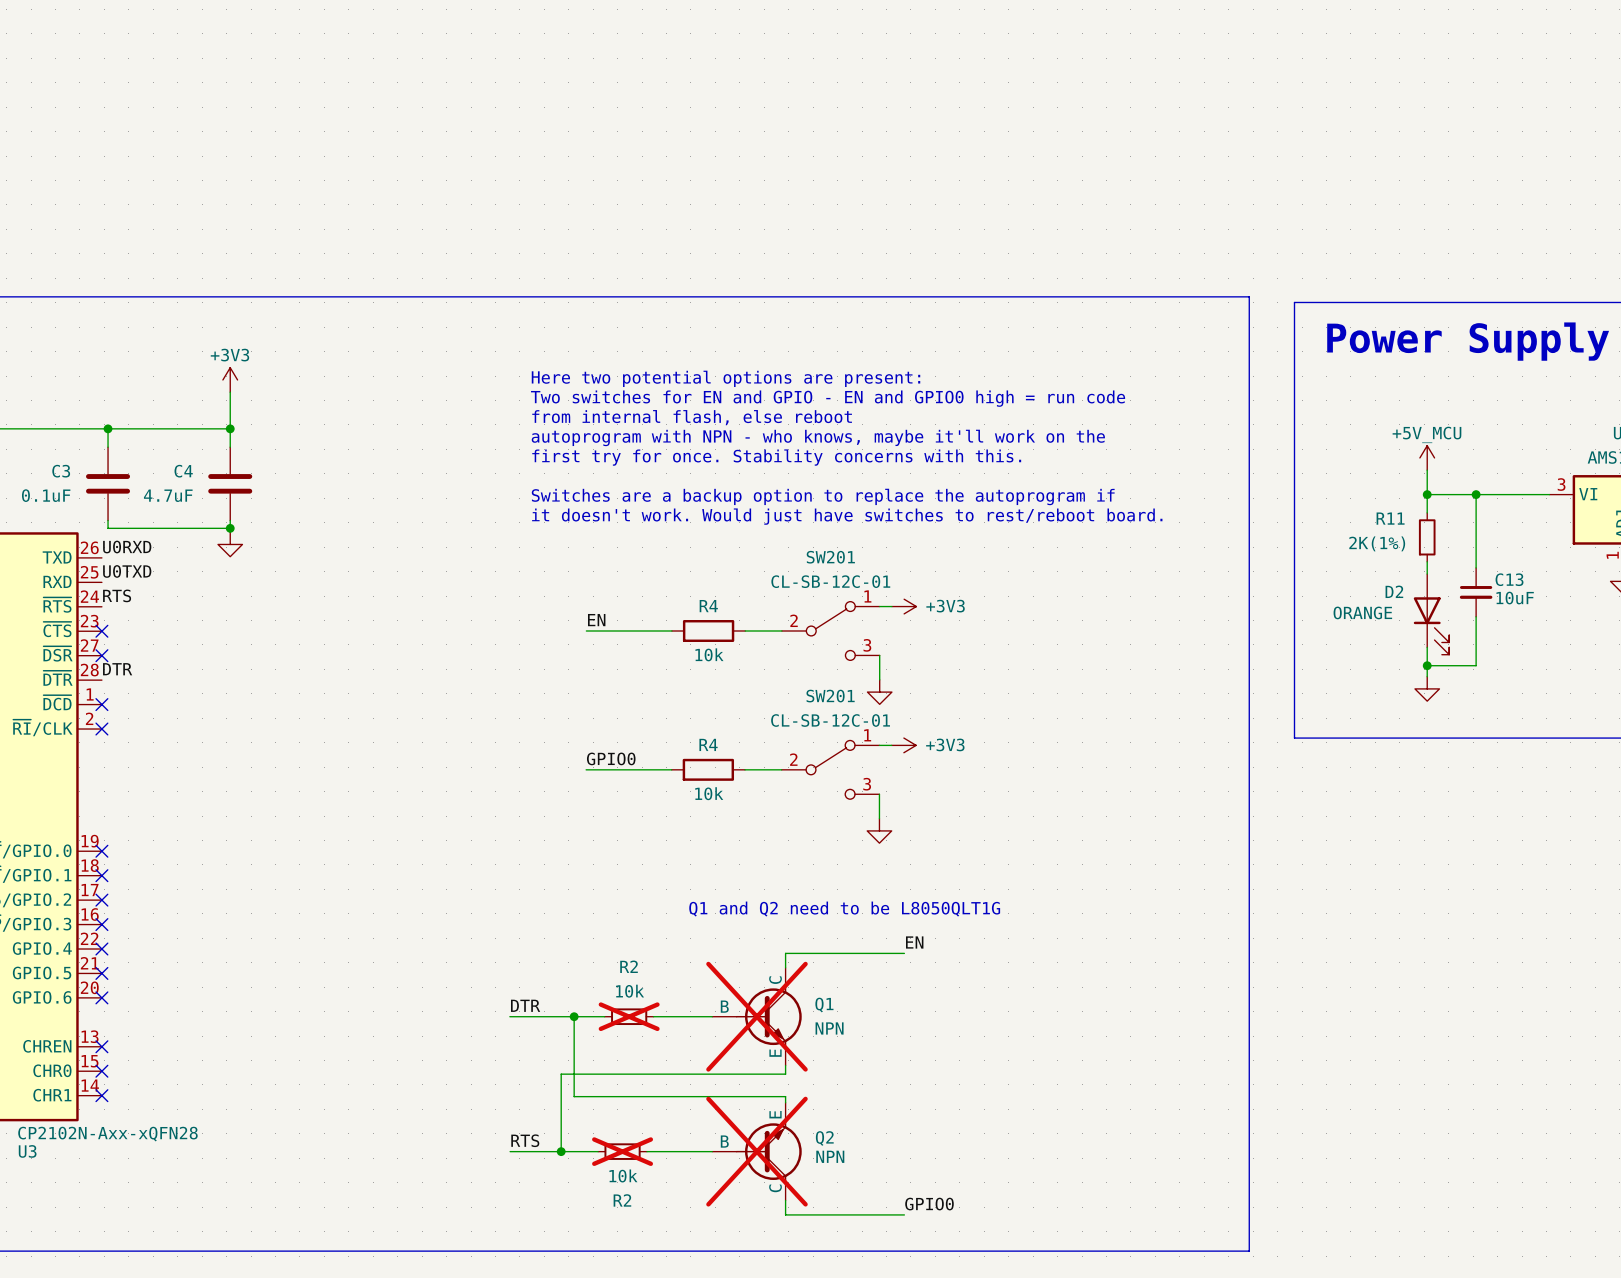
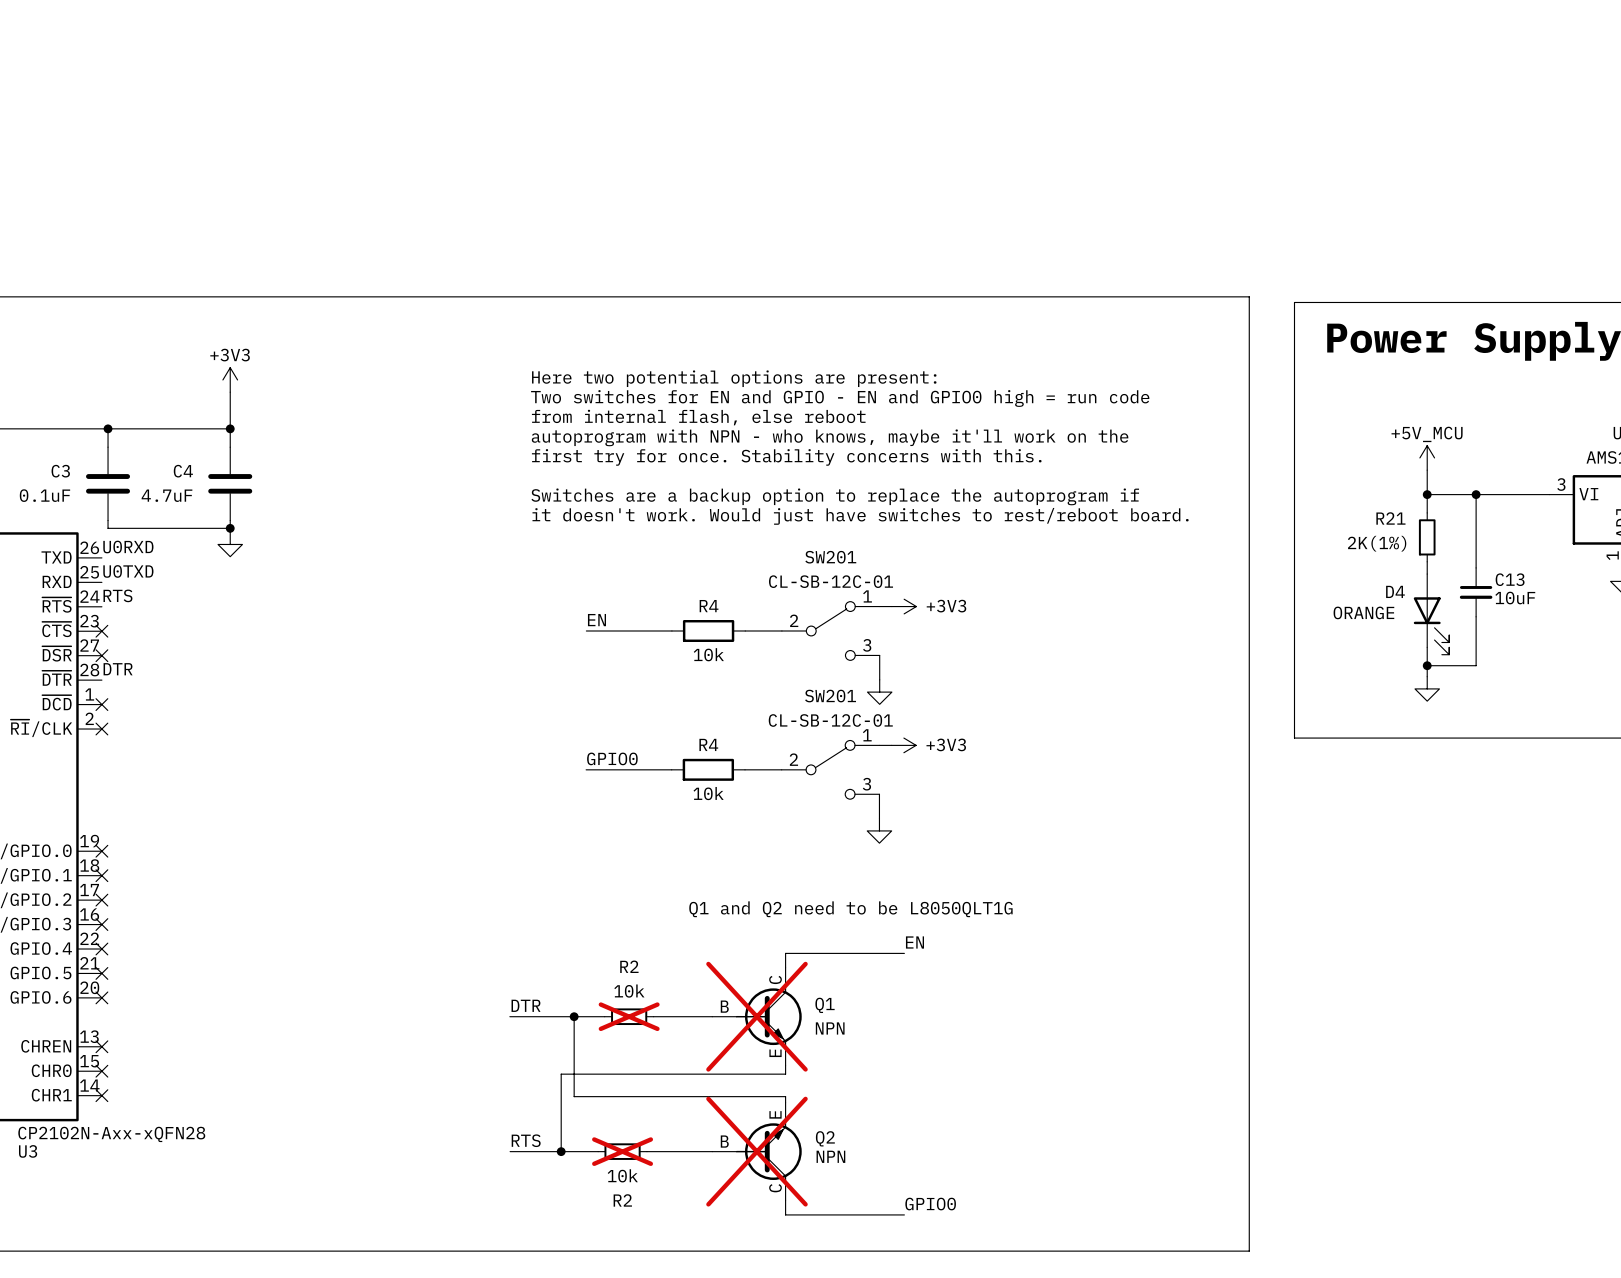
R11 name: R11 (1390, 518) -> R21 (1390, 518)
D2 name: D2 (1394, 591) -> D4 (1395, 591)

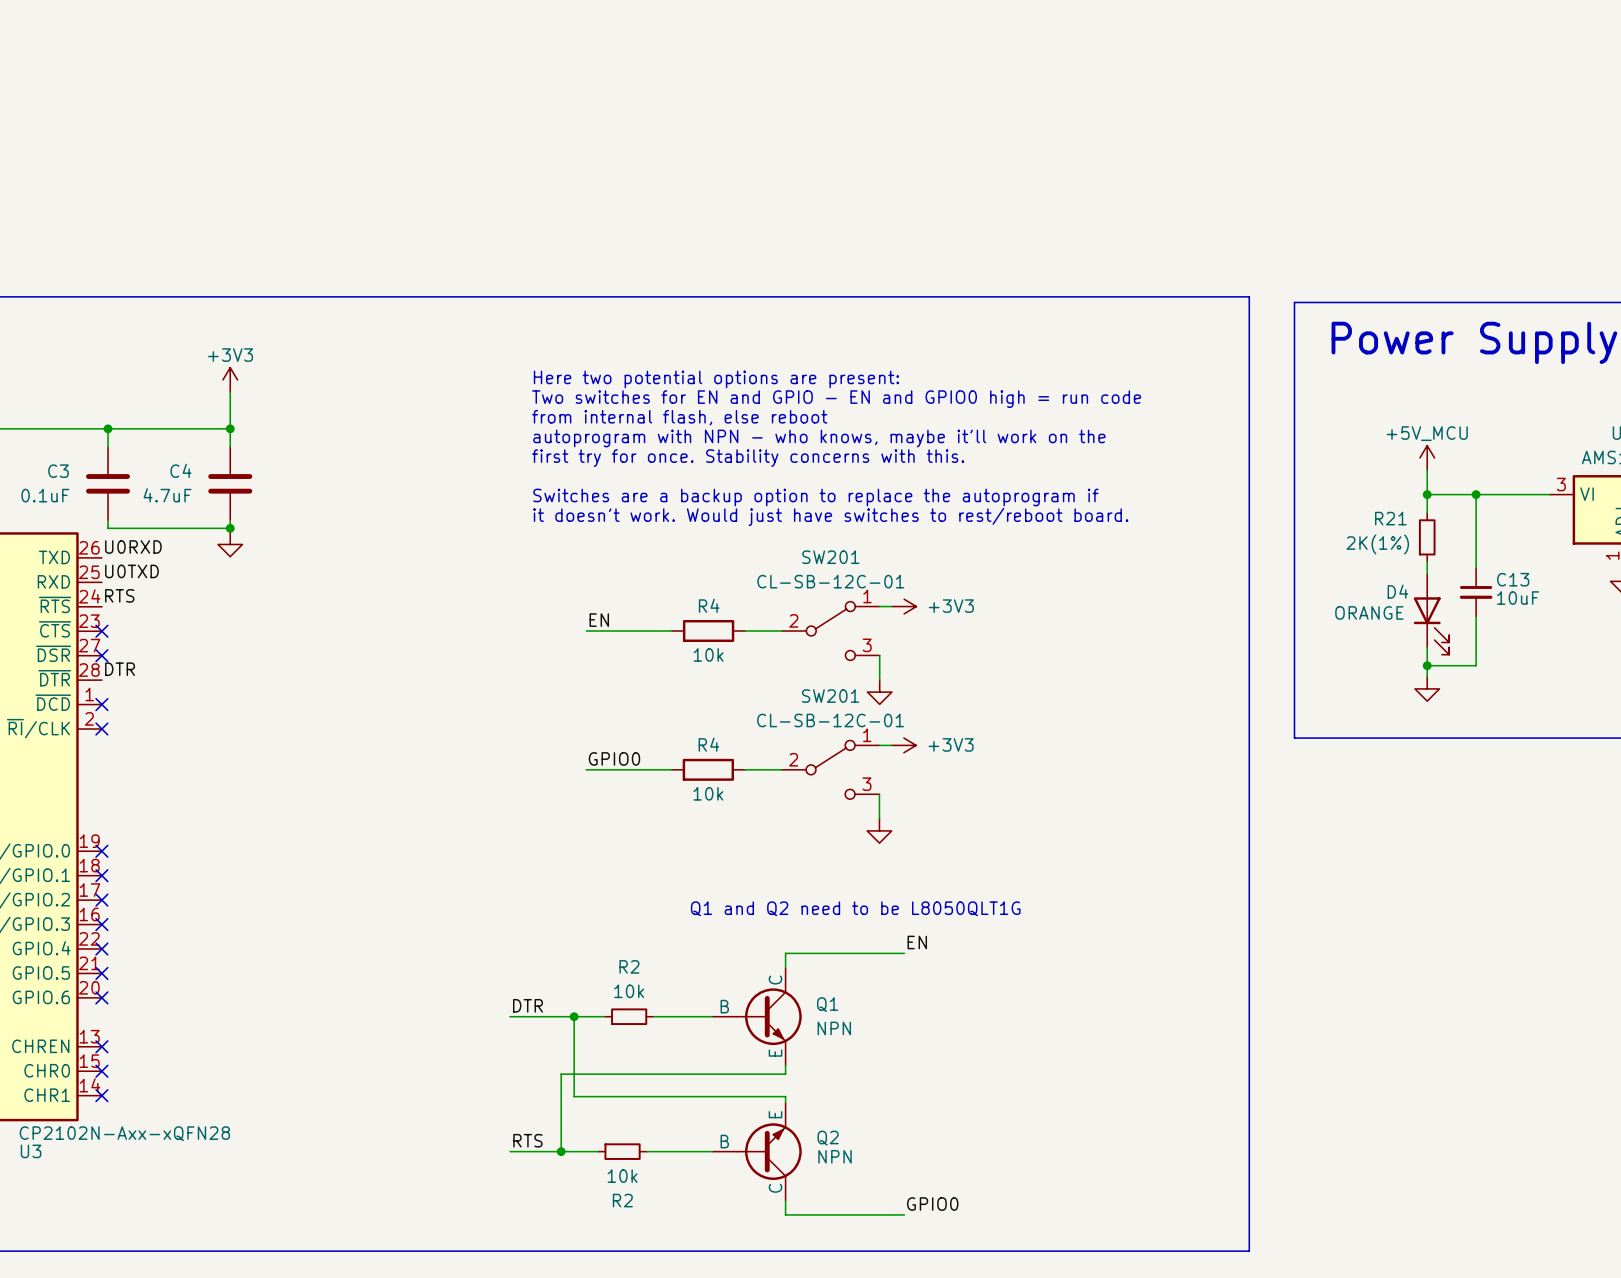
R2 do-not-place cross: (629, 1016) -> none
Q1 do-not-place cross: (756, 1016) -> none
R2 do-not-place cross: (622, 1151) -> none
Q2 do-not-place cross: (756, 1151) -> none

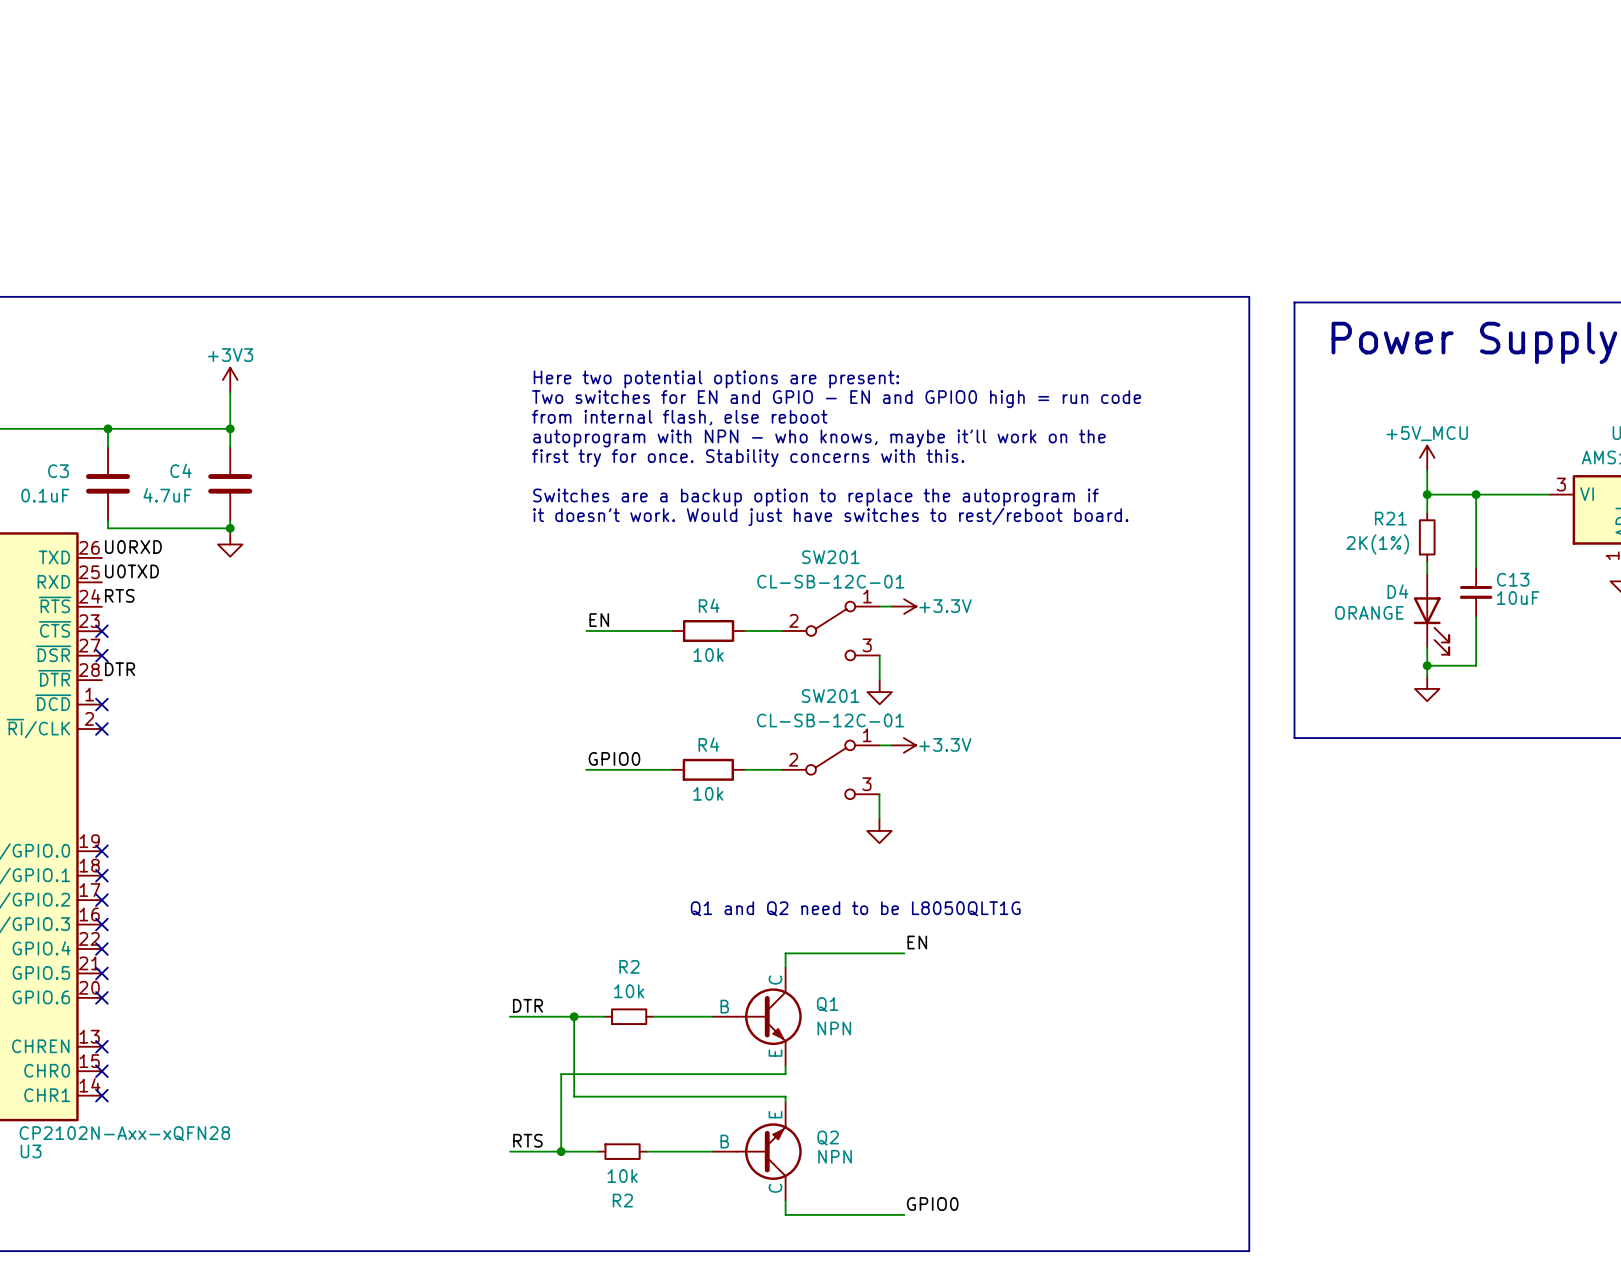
power symbol: +3V3 (904, 606) -> +3.3V (904, 606)
power symbol: +3V3 (903, 745) -> +3.3V (903, 745)

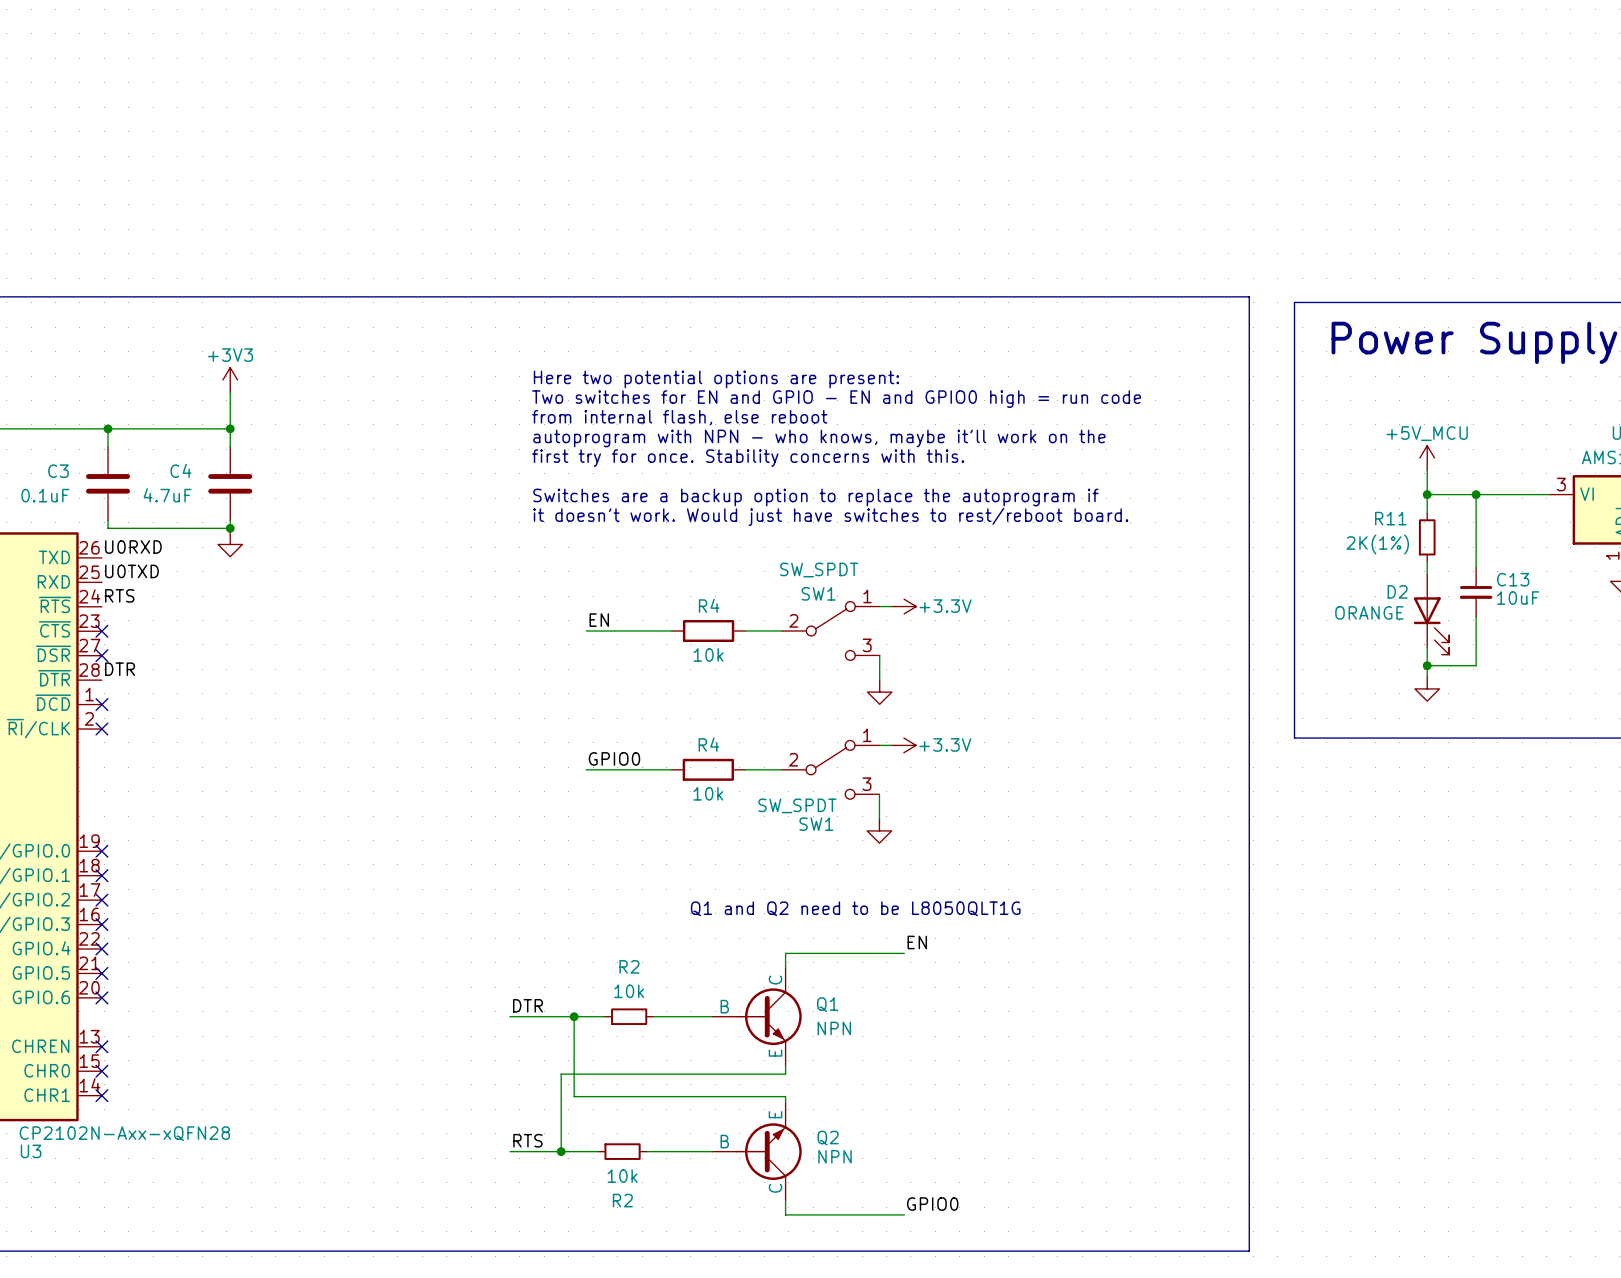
R21 name: R21 (1390, 518) -> R11 (1390, 518)
SW201 name: SW201 (830, 557) -> SW1 (818, 593)
SW201 value: CL-SB-12C-01 (830, 581) -> SW_SPDT (819, 570)
D4 name: D4 (1397, 591) -> D2 (1397, 591)
SW201 name: SW201 (830, 696) -> SW1 (816, 824)
SW201 value: CL-SB-12C-01 (830, 720) -> SW_SPDT (797, 805)

